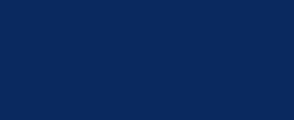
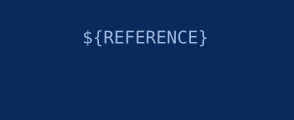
text: none -> ${REFERENCE} (145, 38)

